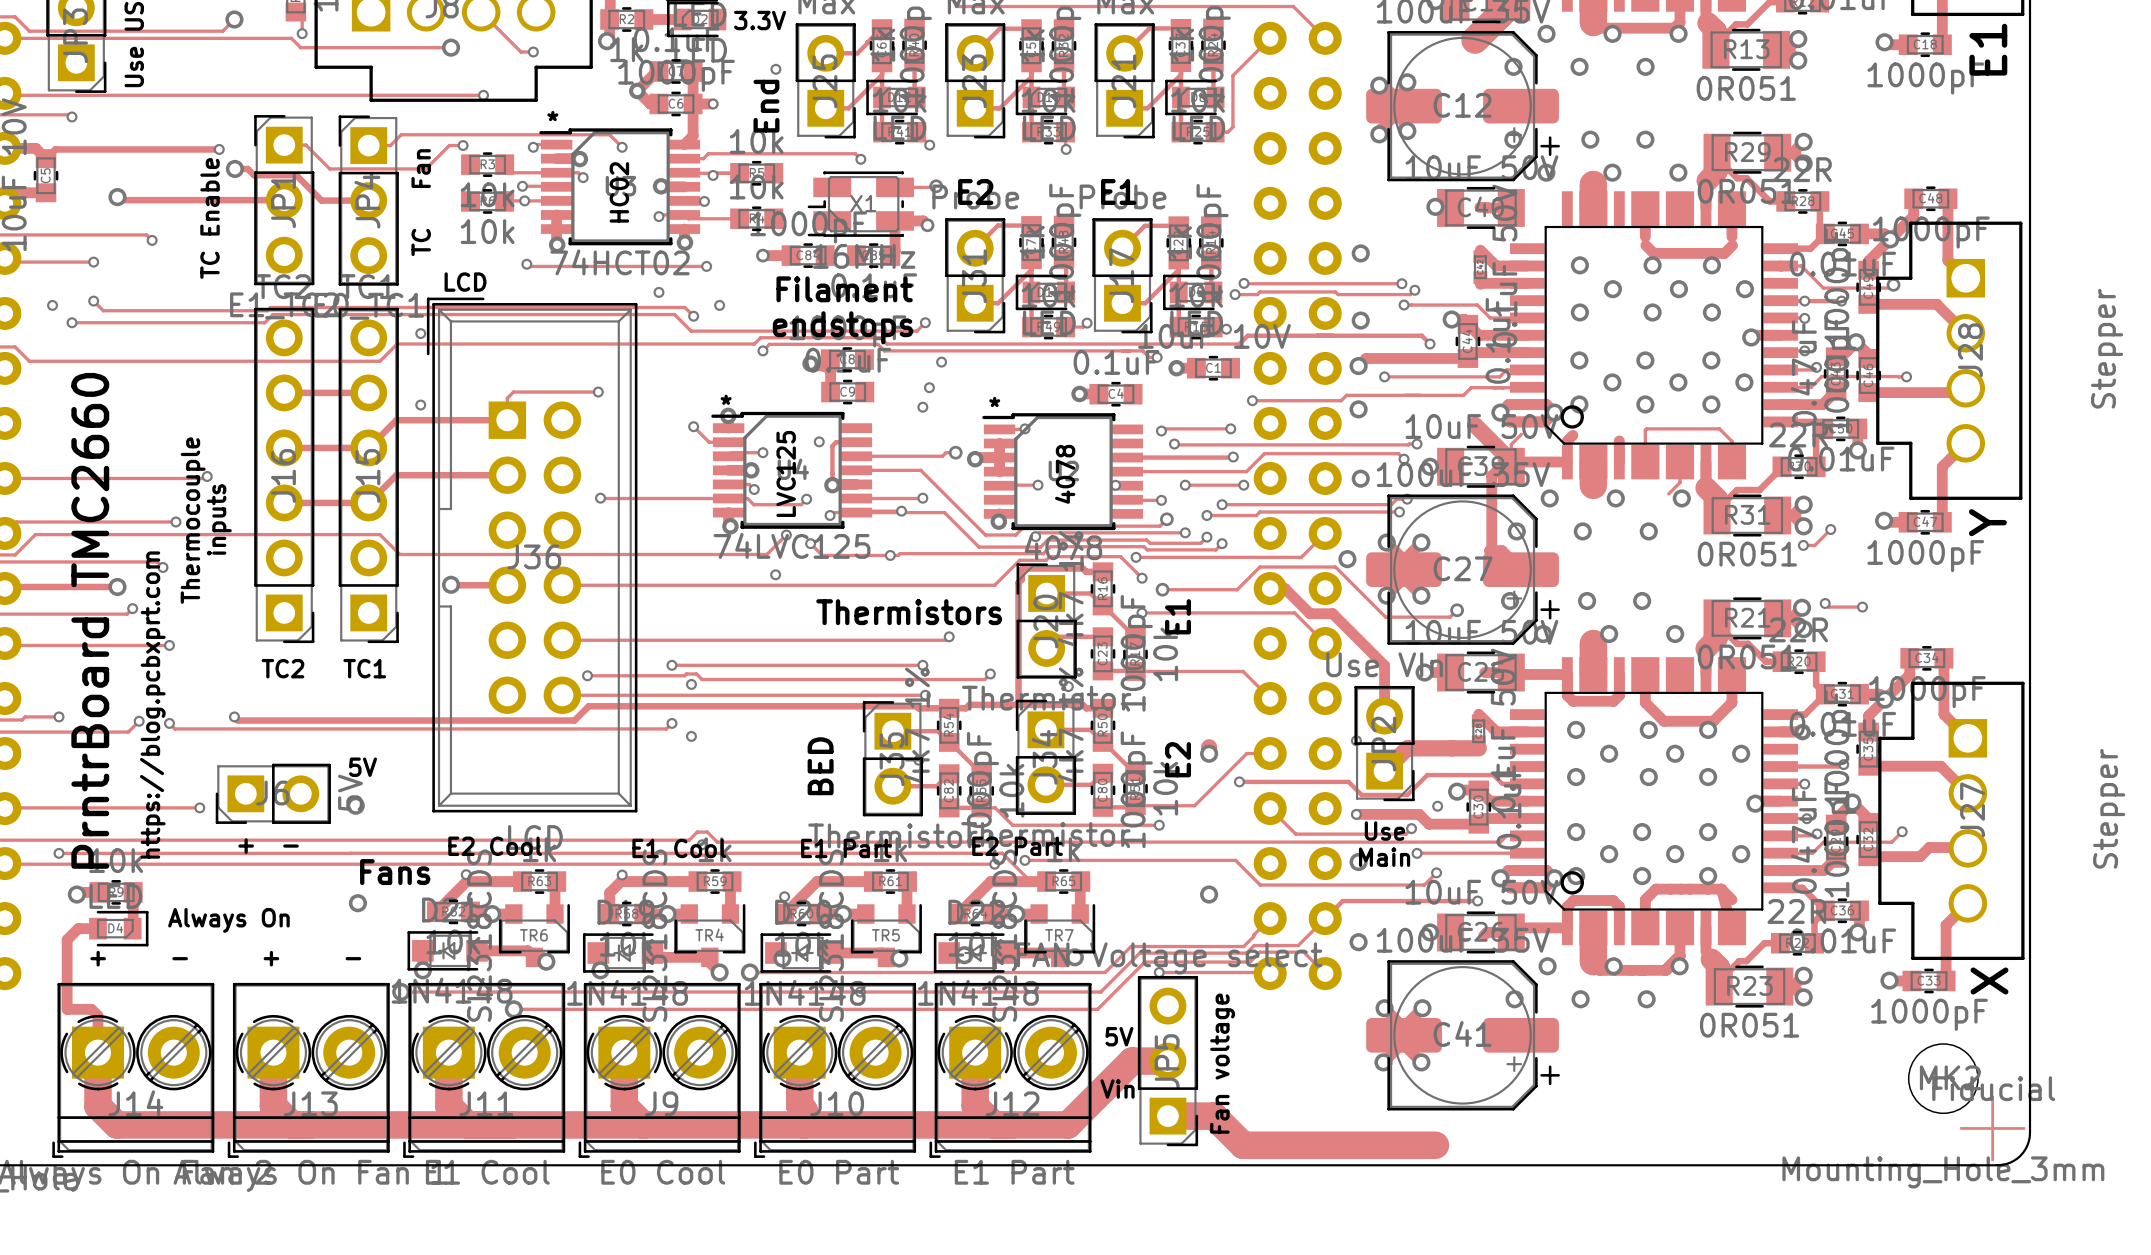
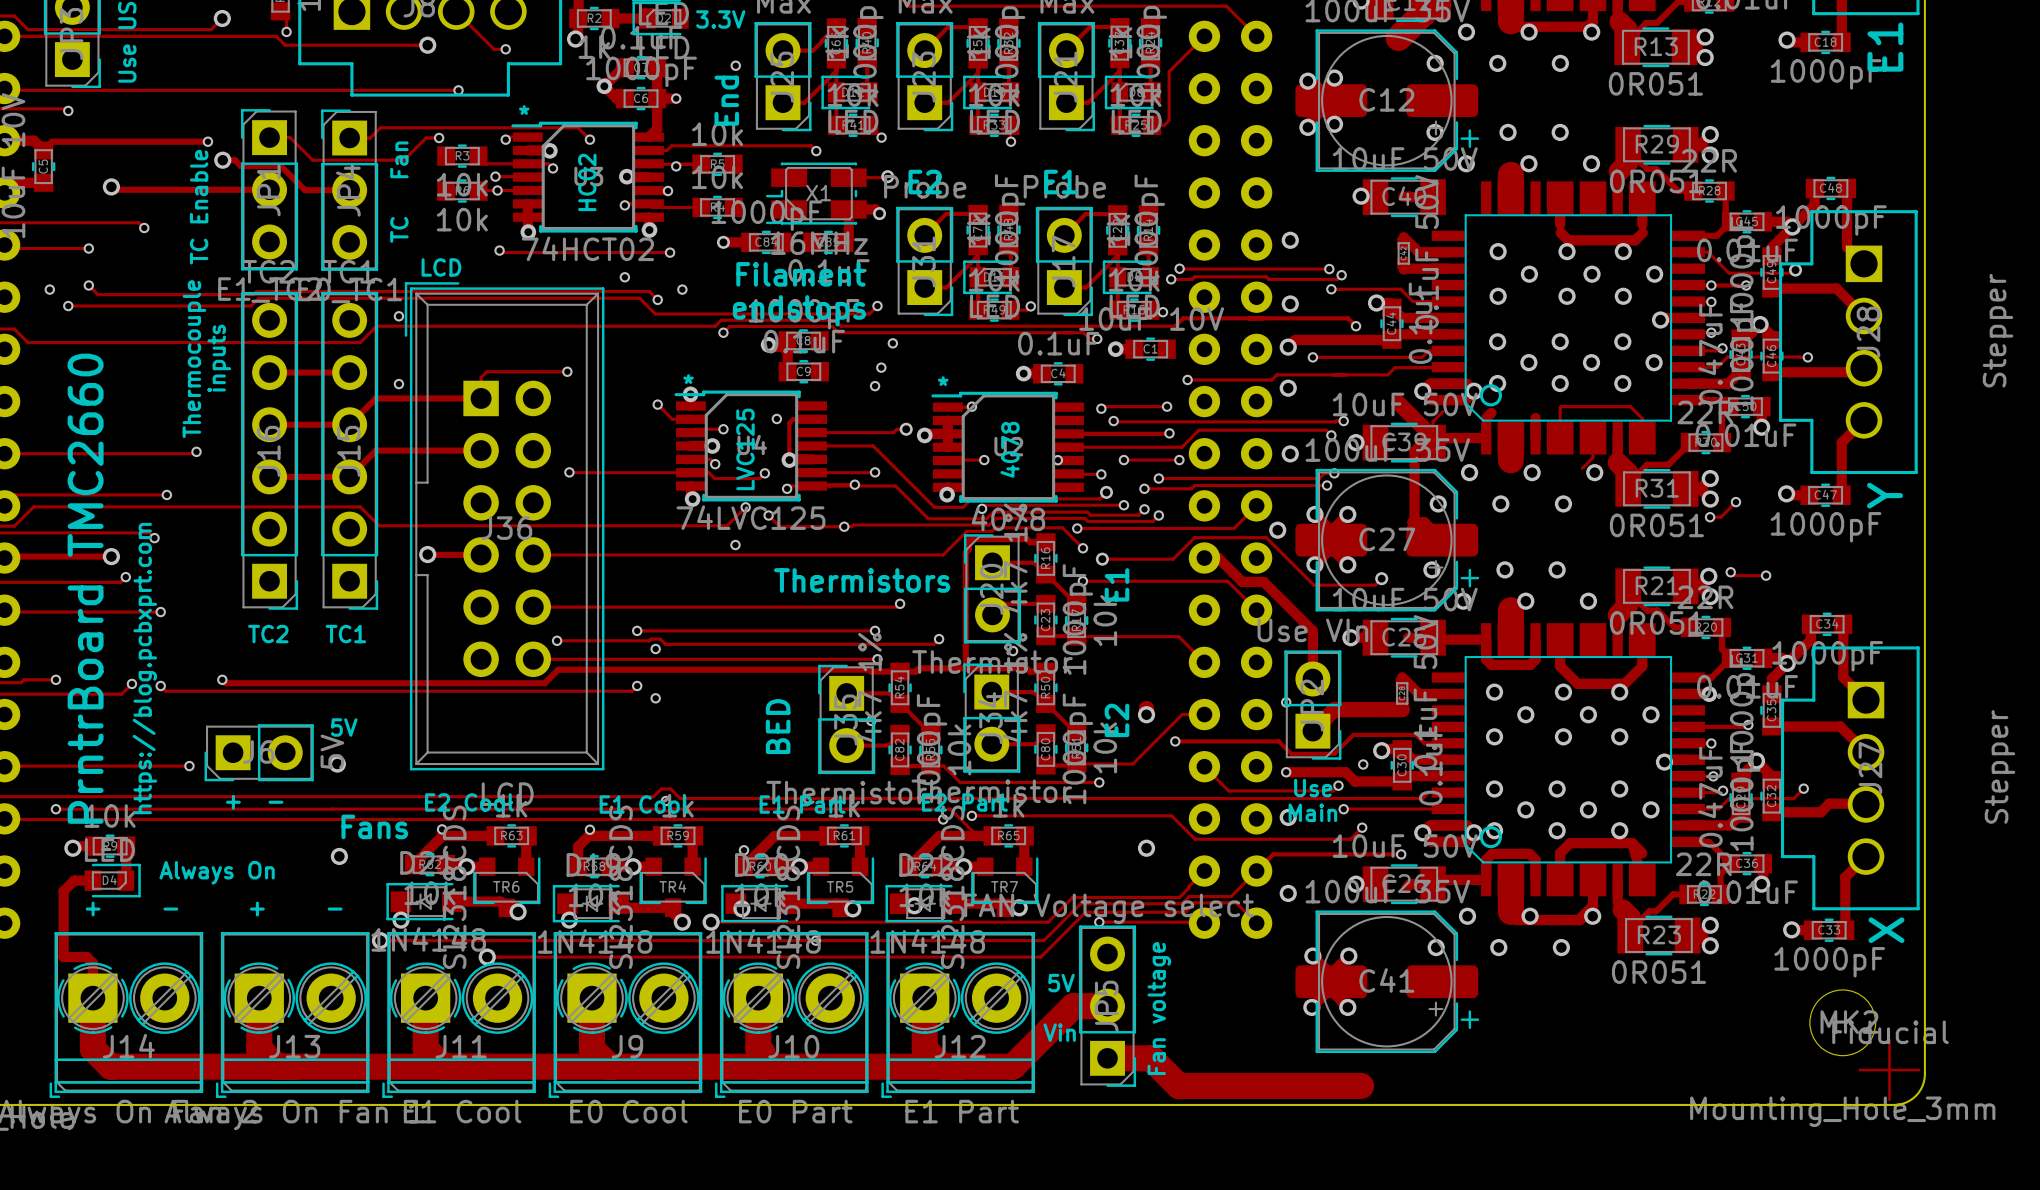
text position: inputs (219, 519) -> inputs (219, 358)
text position: Thermocouple (193, 520) -> Thermocouple (194, 359)

